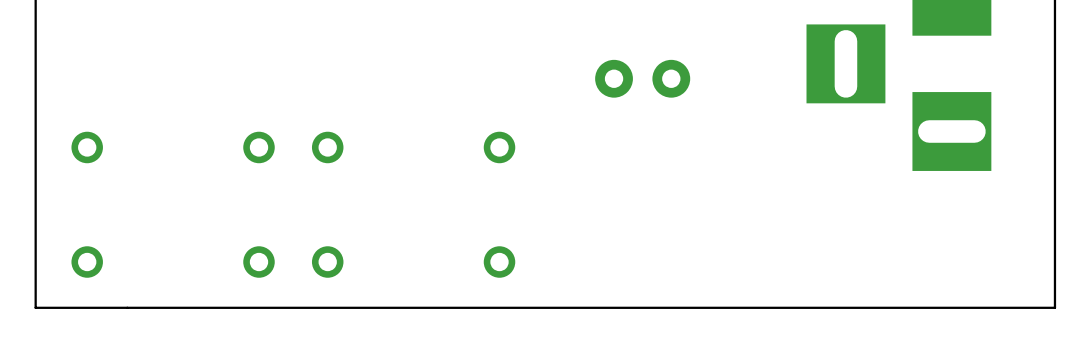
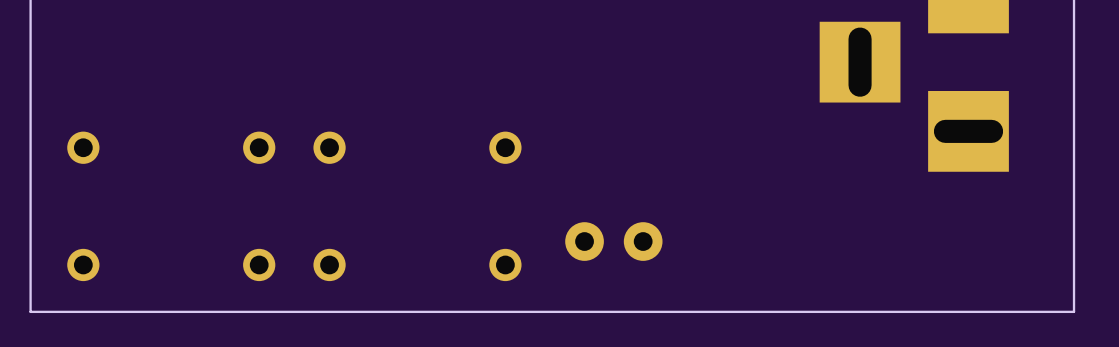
part position: (642, 78) -> (613, 241)

